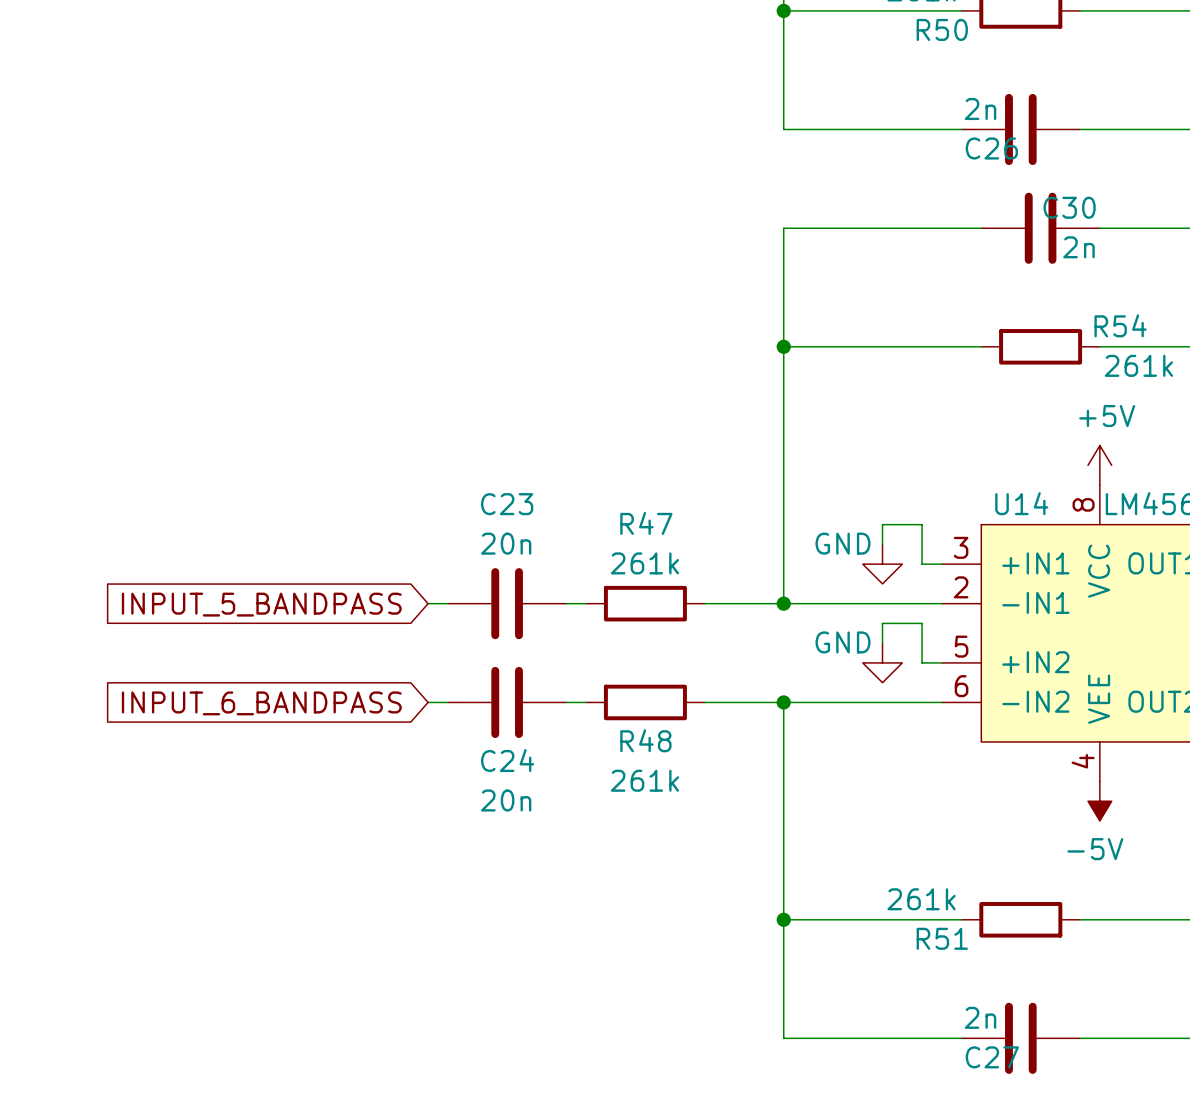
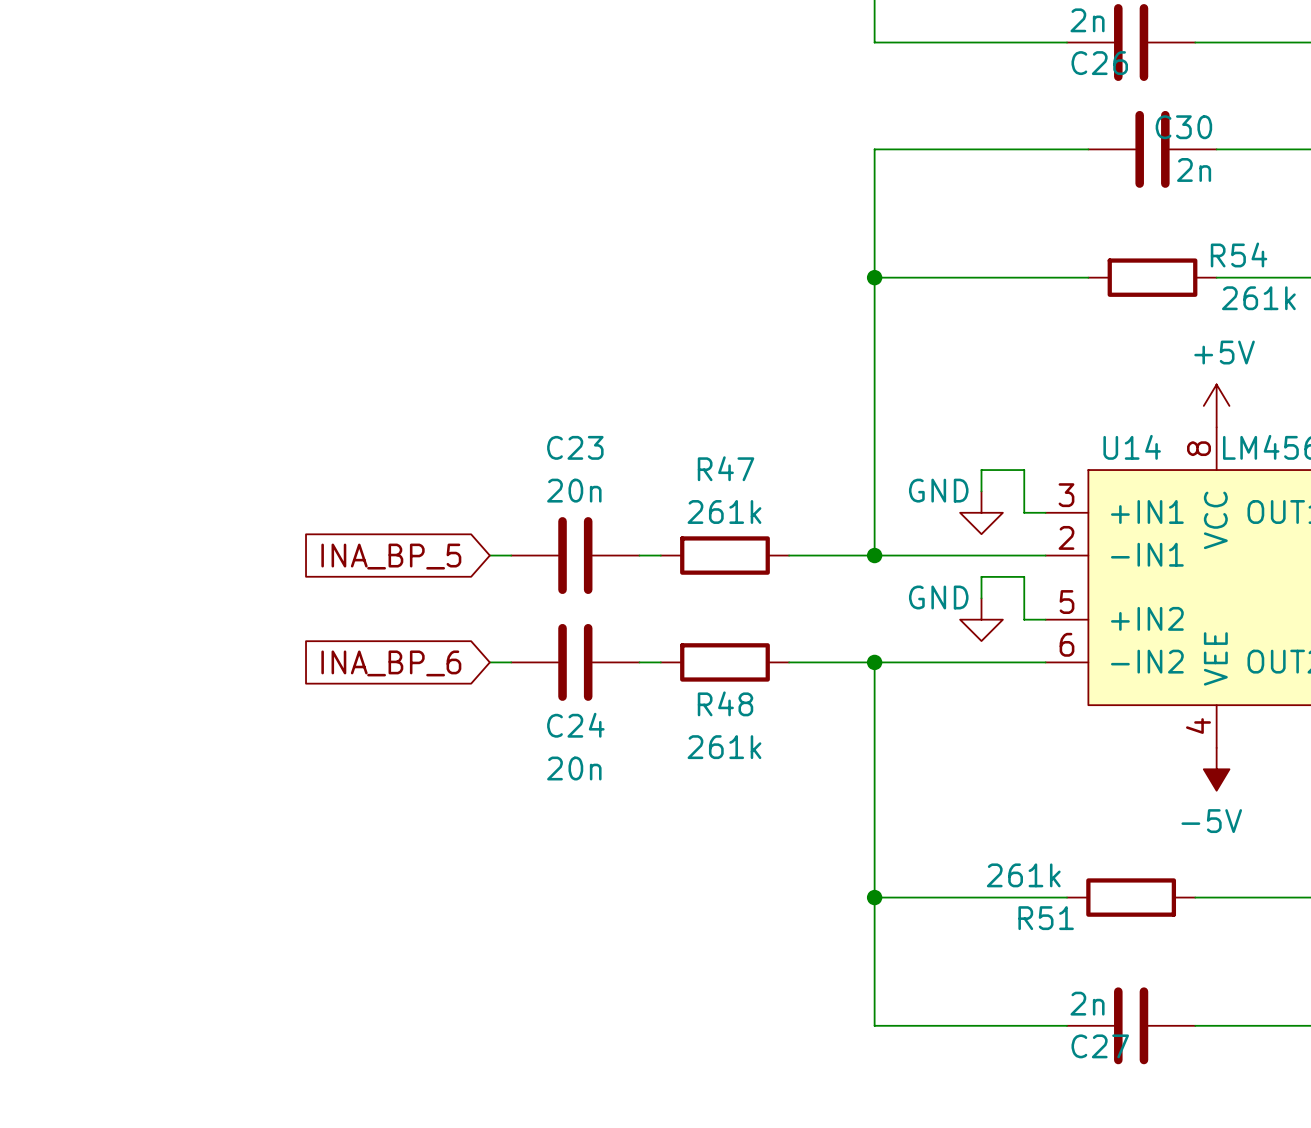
global label: INPUT_5_BANDPASS (261, 604) -> INA_BP_5 (391, 556)
global label: INPUT_6_BANDPASS (261, 703) -> INA_BP_6 (391, 663)

